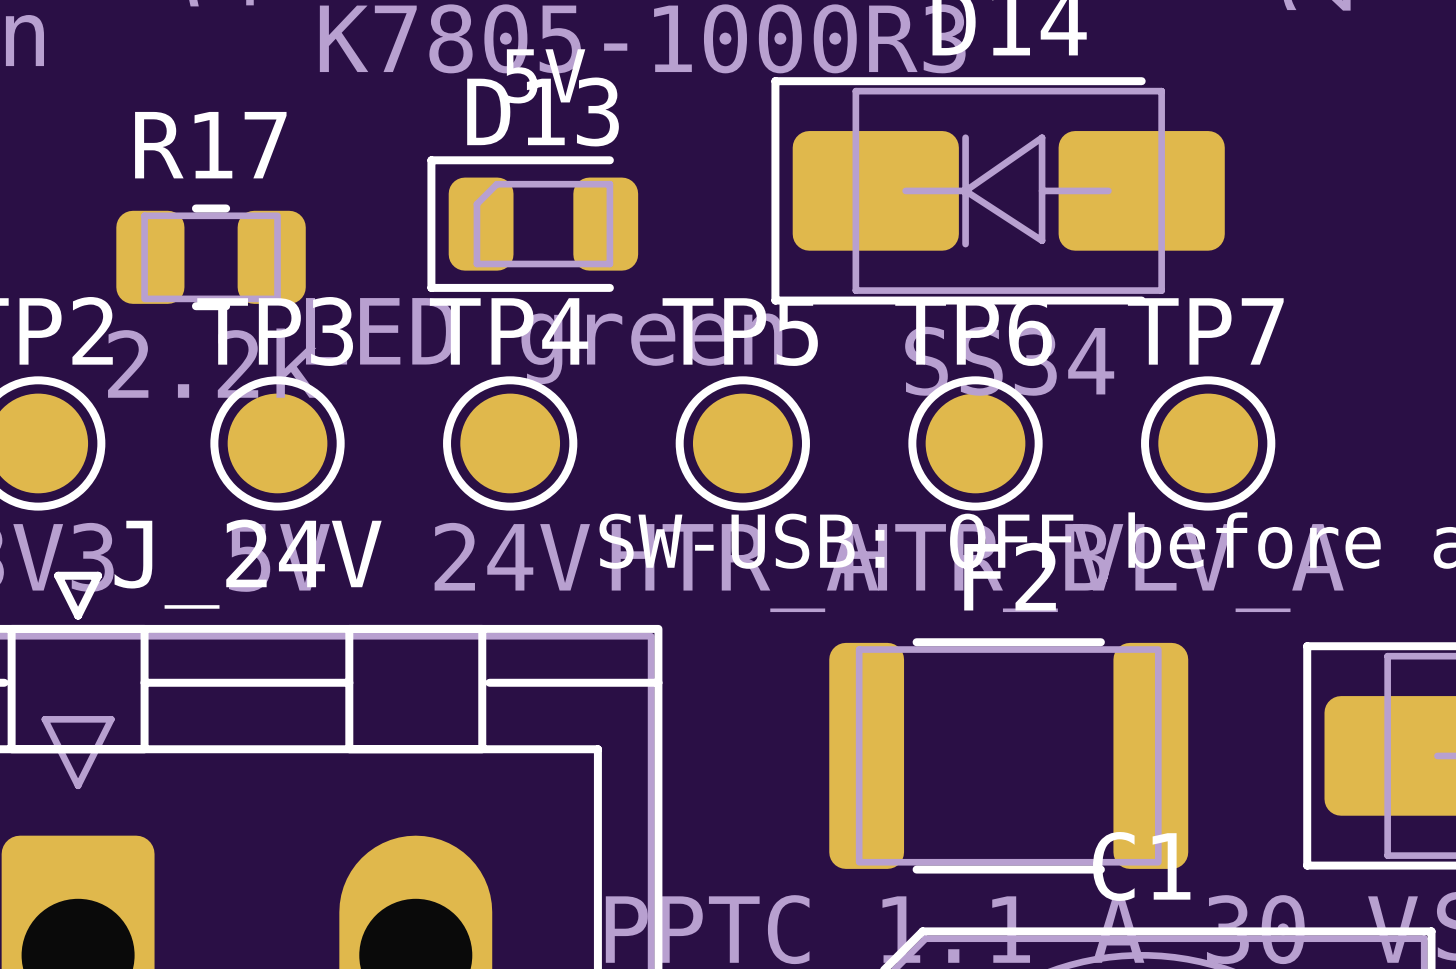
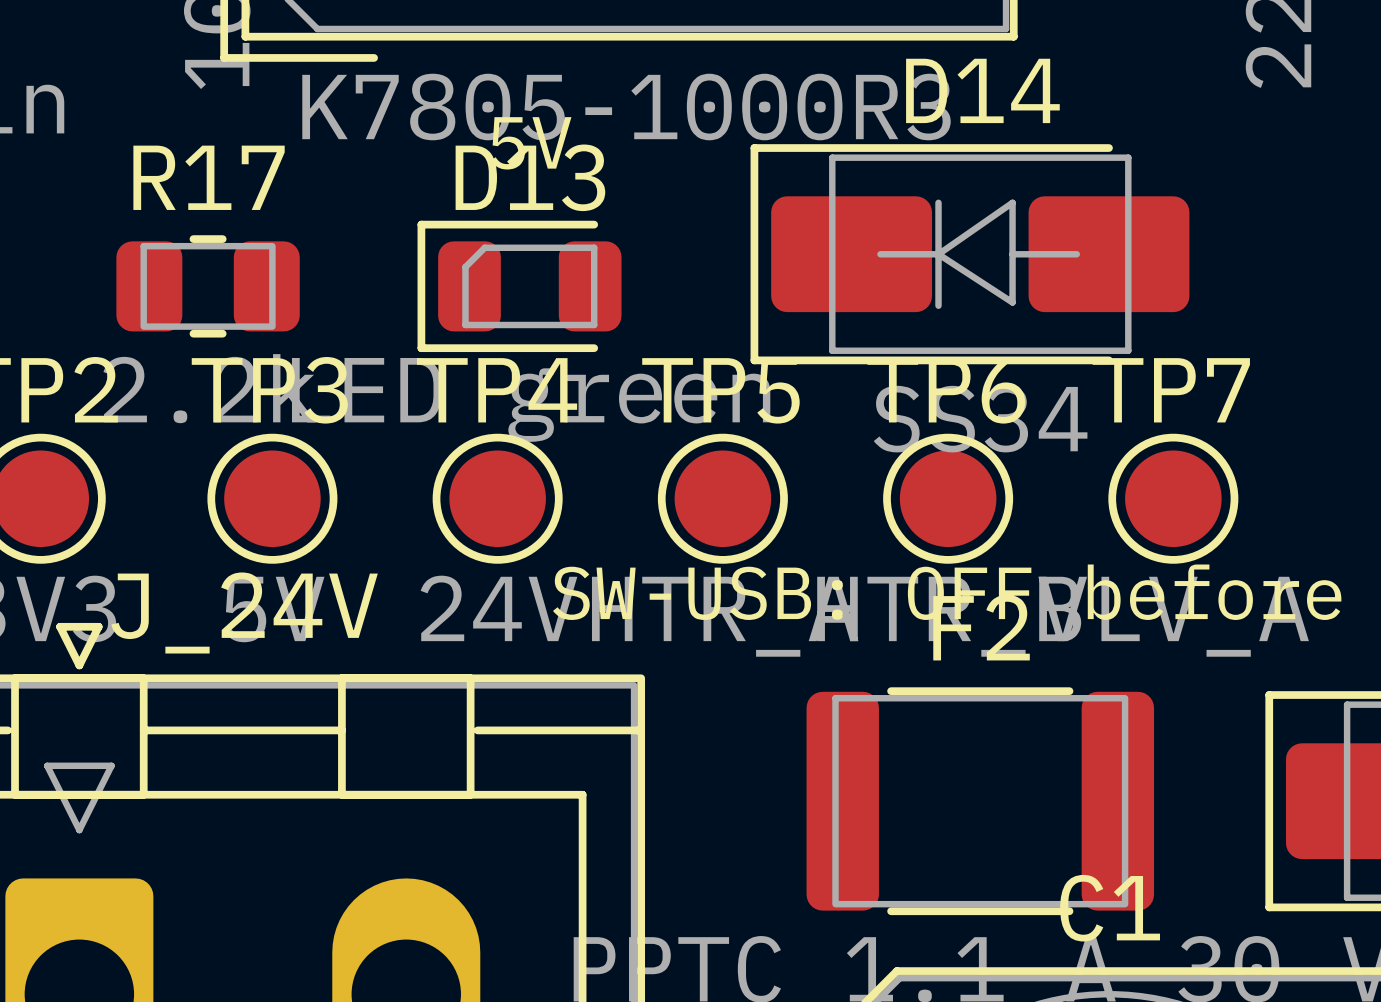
R17 position: (211, 257) -> (208, 286)

